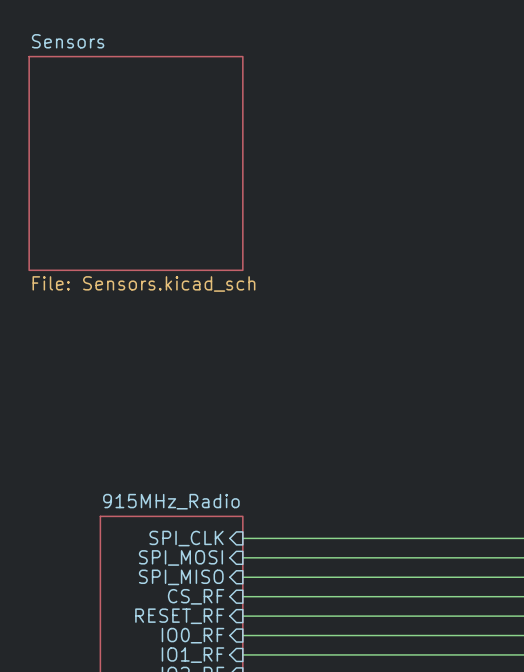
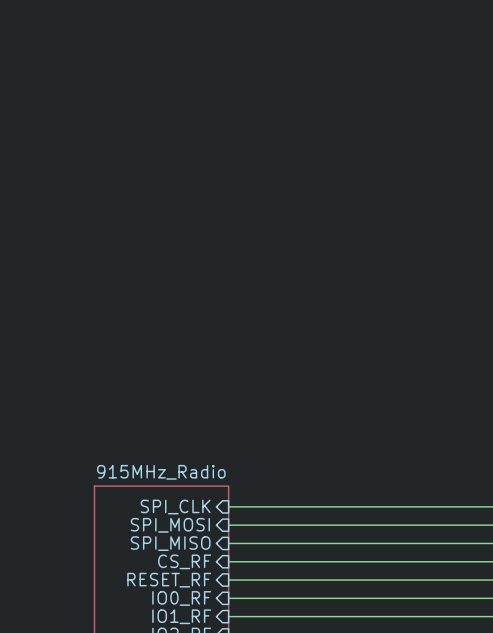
sheet Sensors: File: Sensors.kicad_sch (135, 163) -> none

